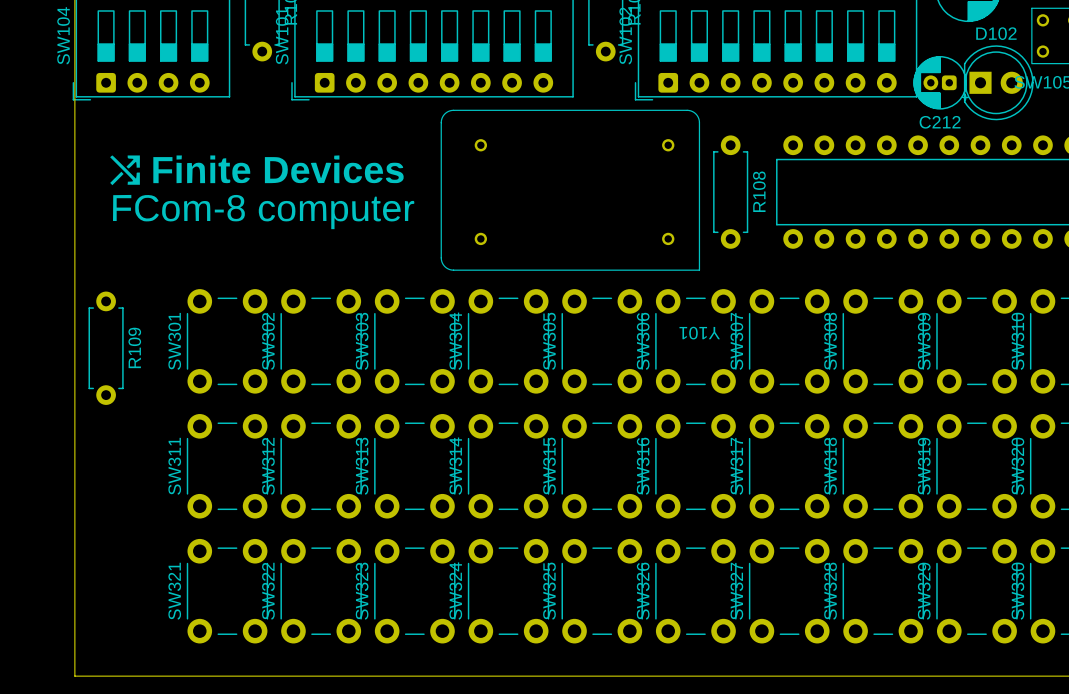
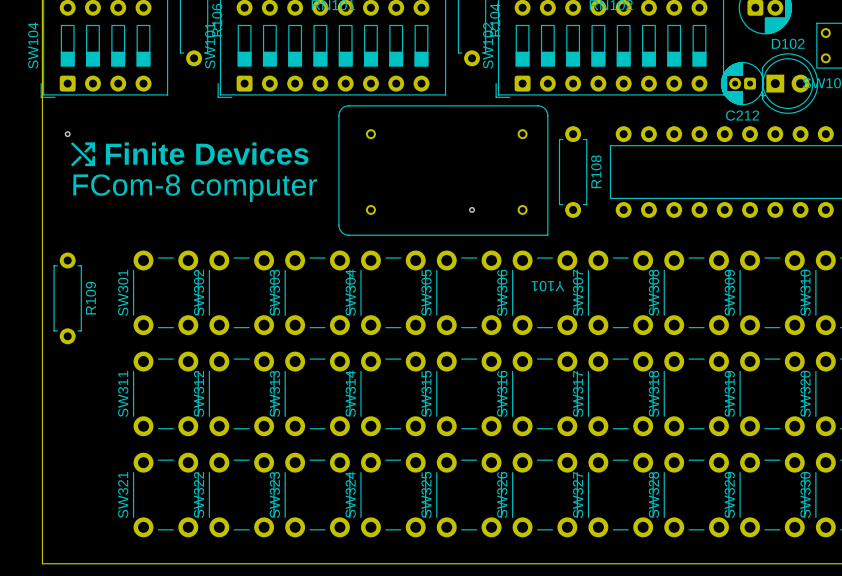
via: none -> (67, 134)
via: none -> (472, 209)

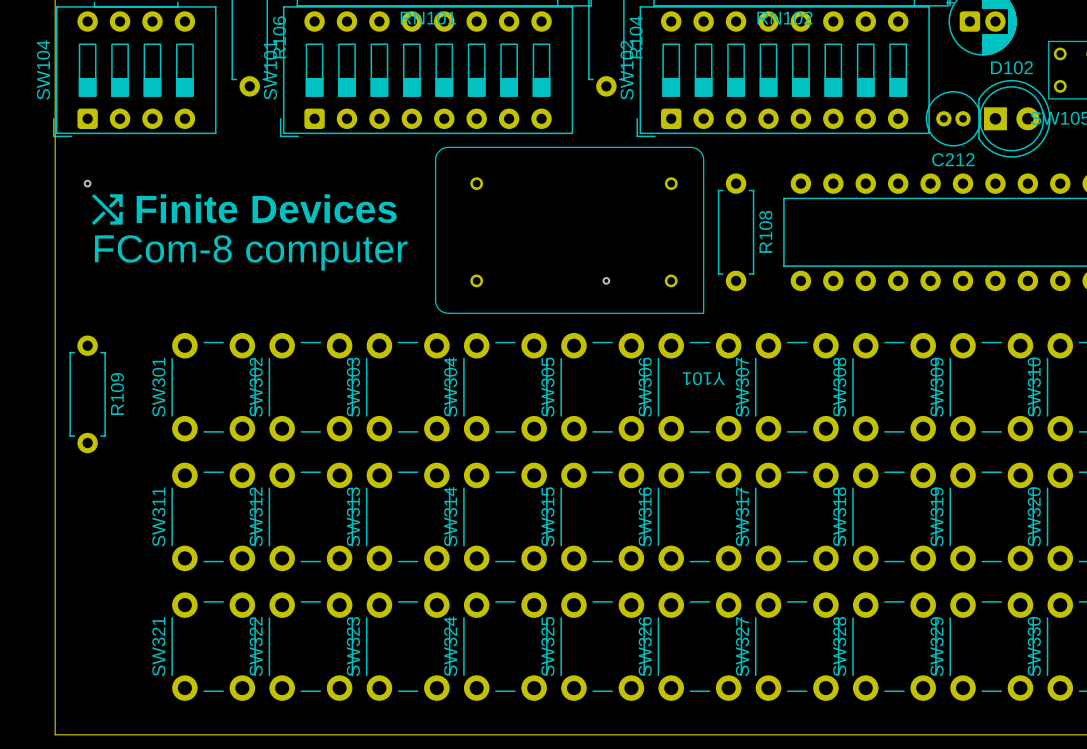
C212 footprint: [720, 61, 766, 106] -> [925, 90, 982, 147]

